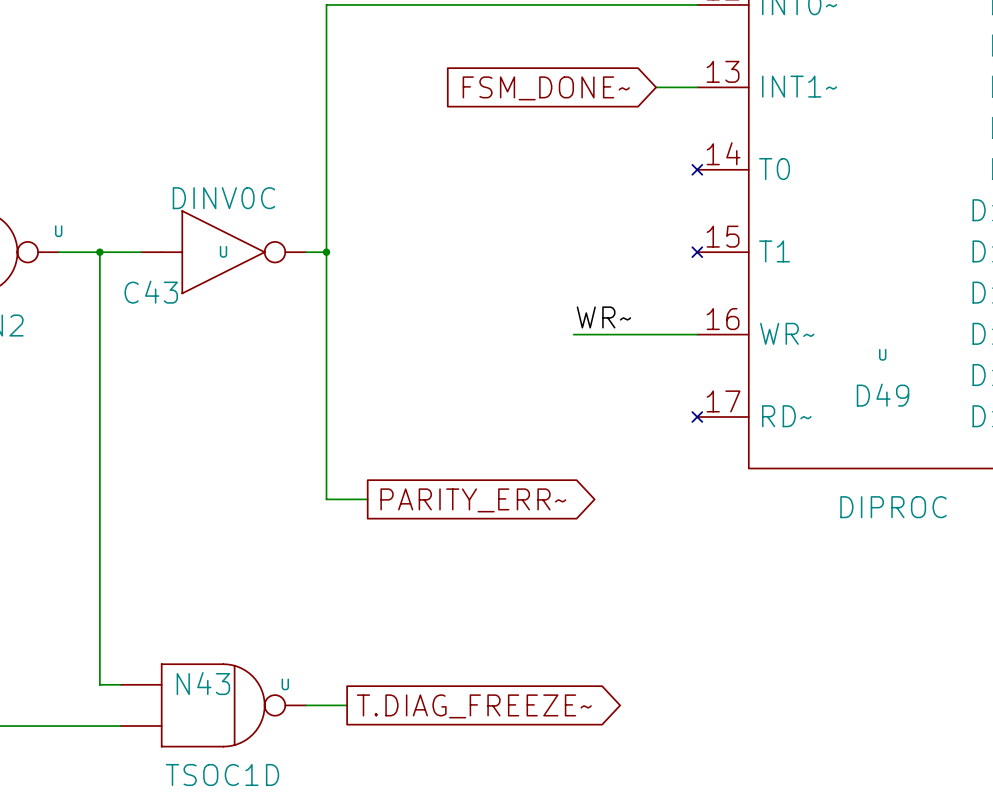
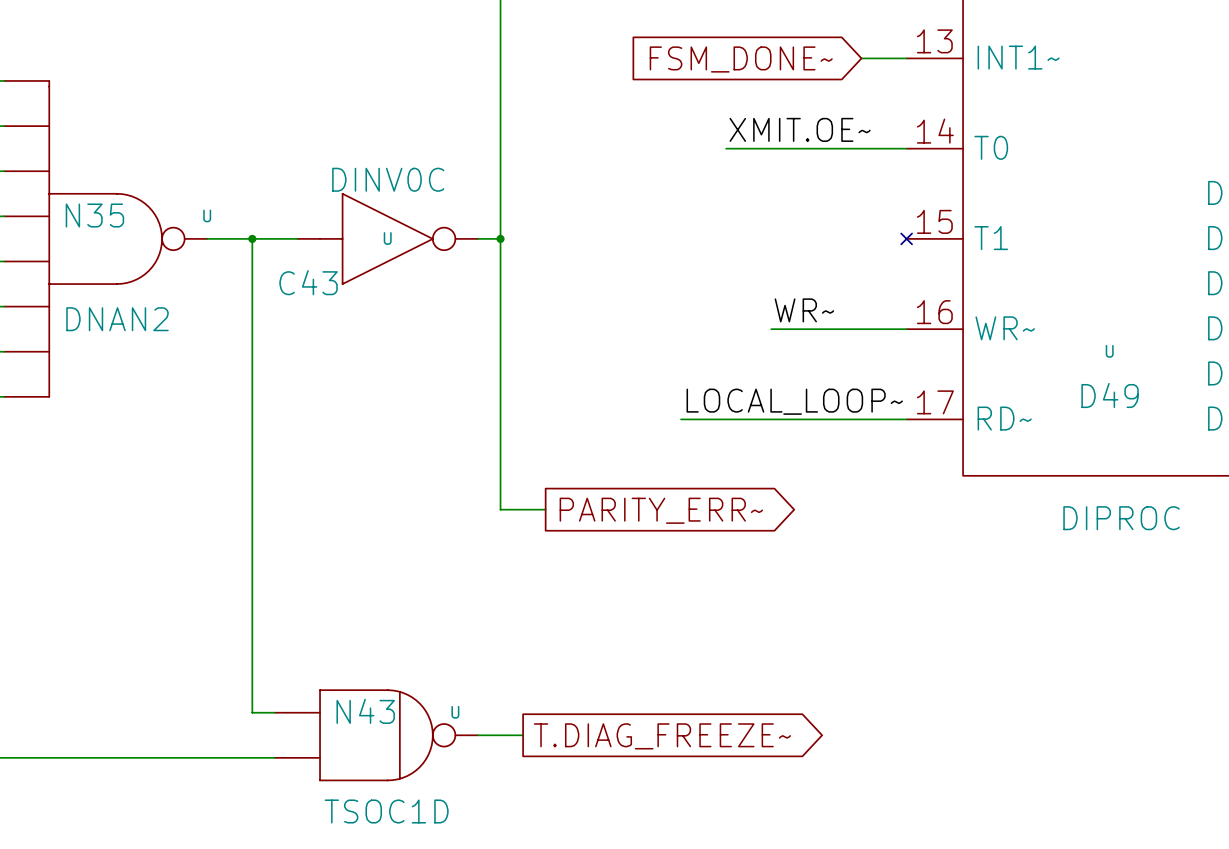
label: none -> XMIT.OE~ (800, 129)
wire: none -> (726, 148) (906, 148)
no-connect mark: (697, 169) -> none
label: none -> LOCAL_LOOP~ (794, 401)
wire: none -> (681, 419) (906, 419)
no-connect mark: (697, 417) -> none

